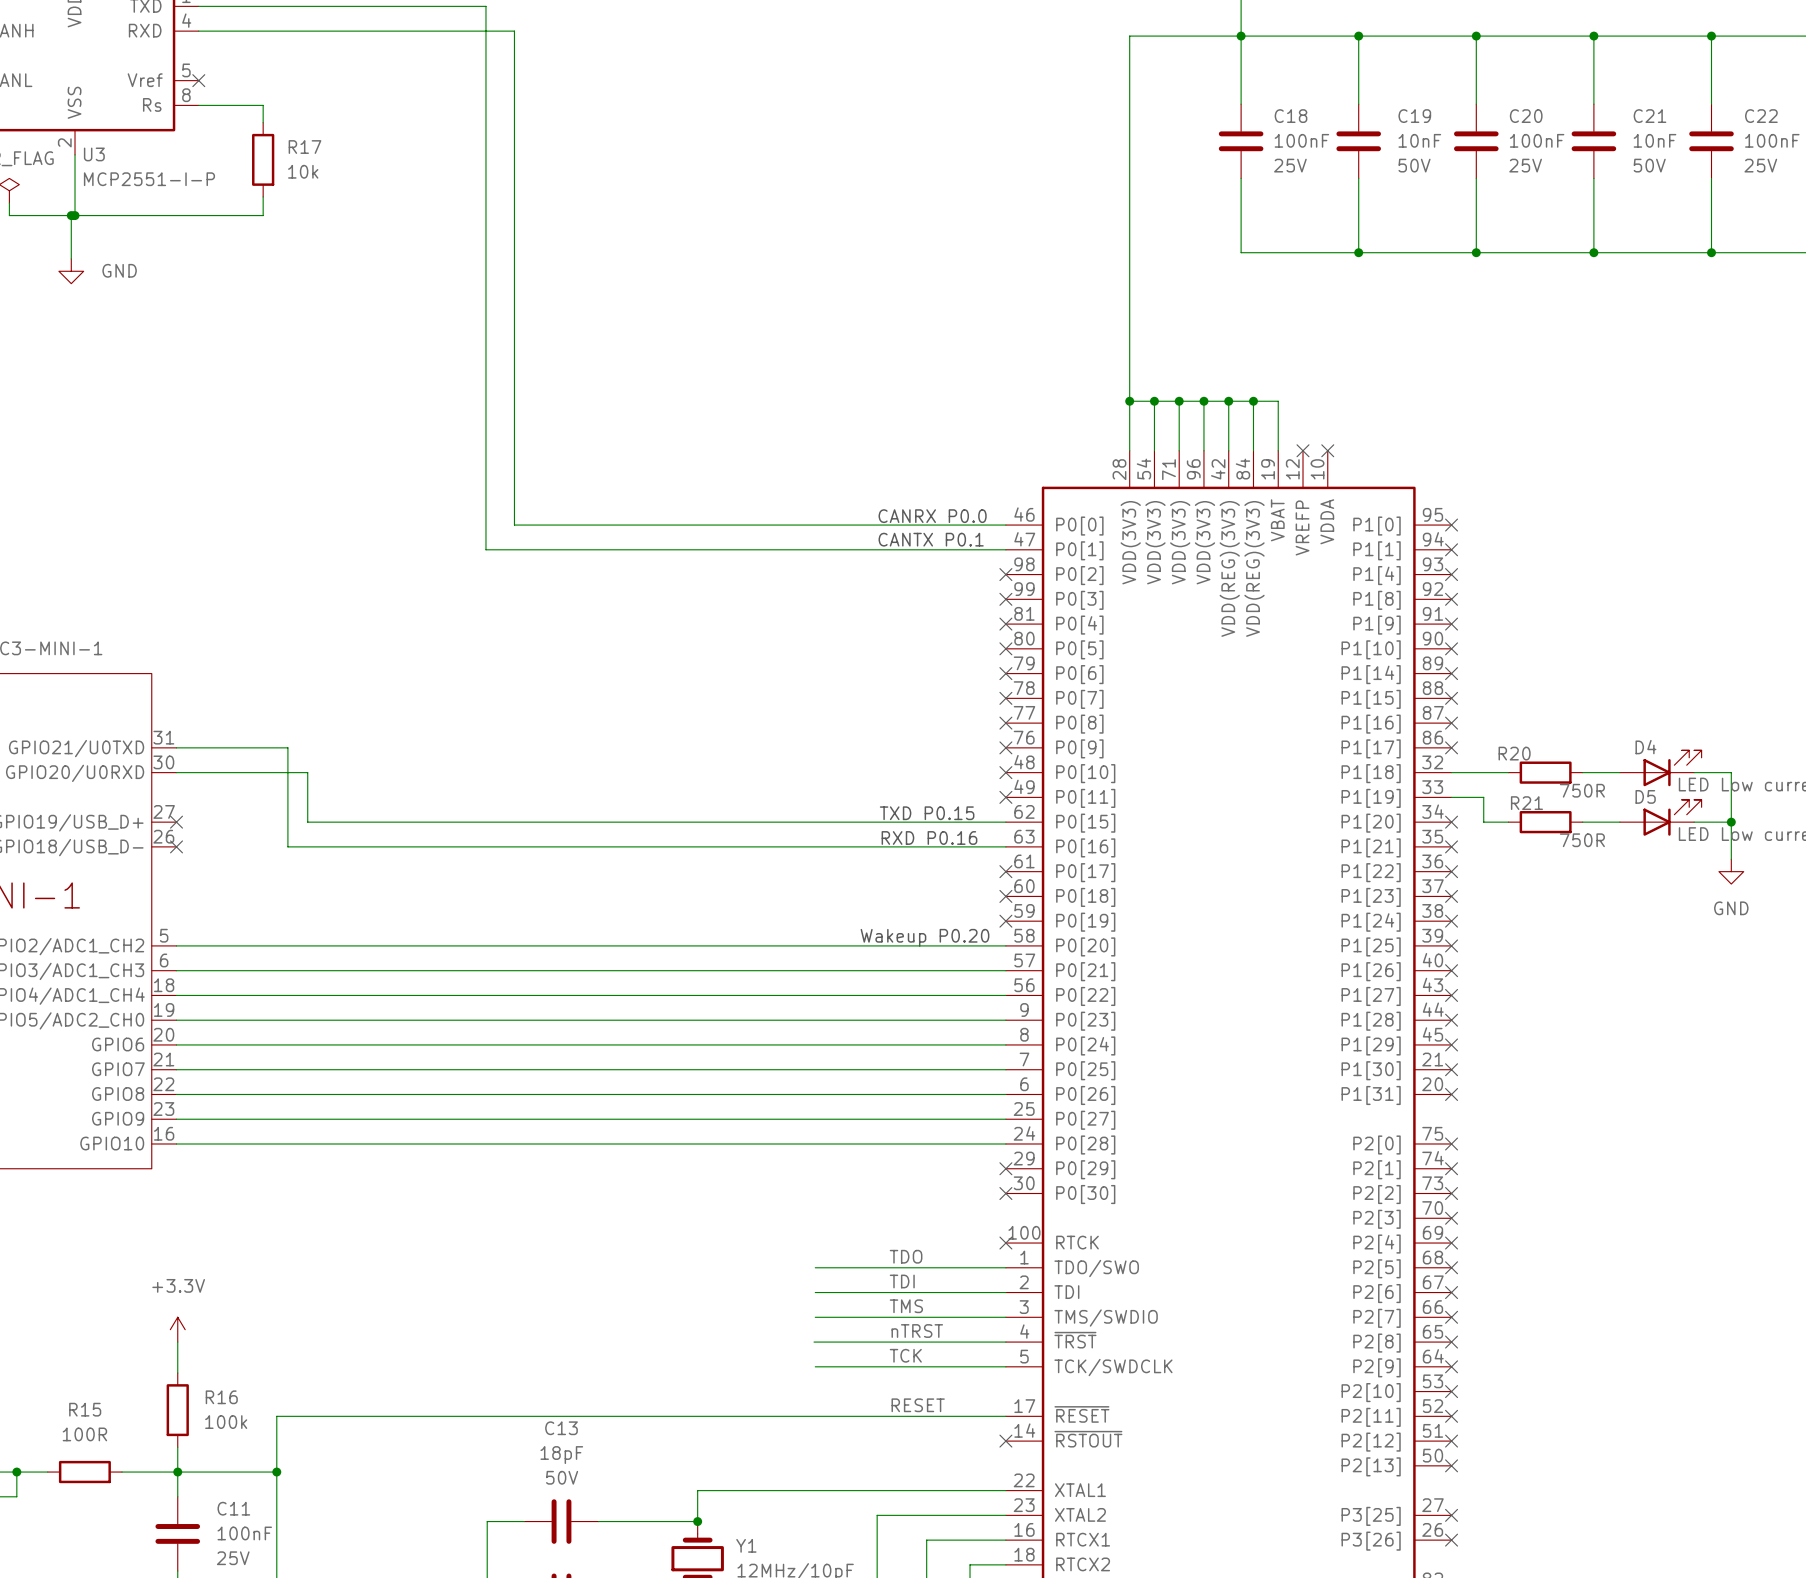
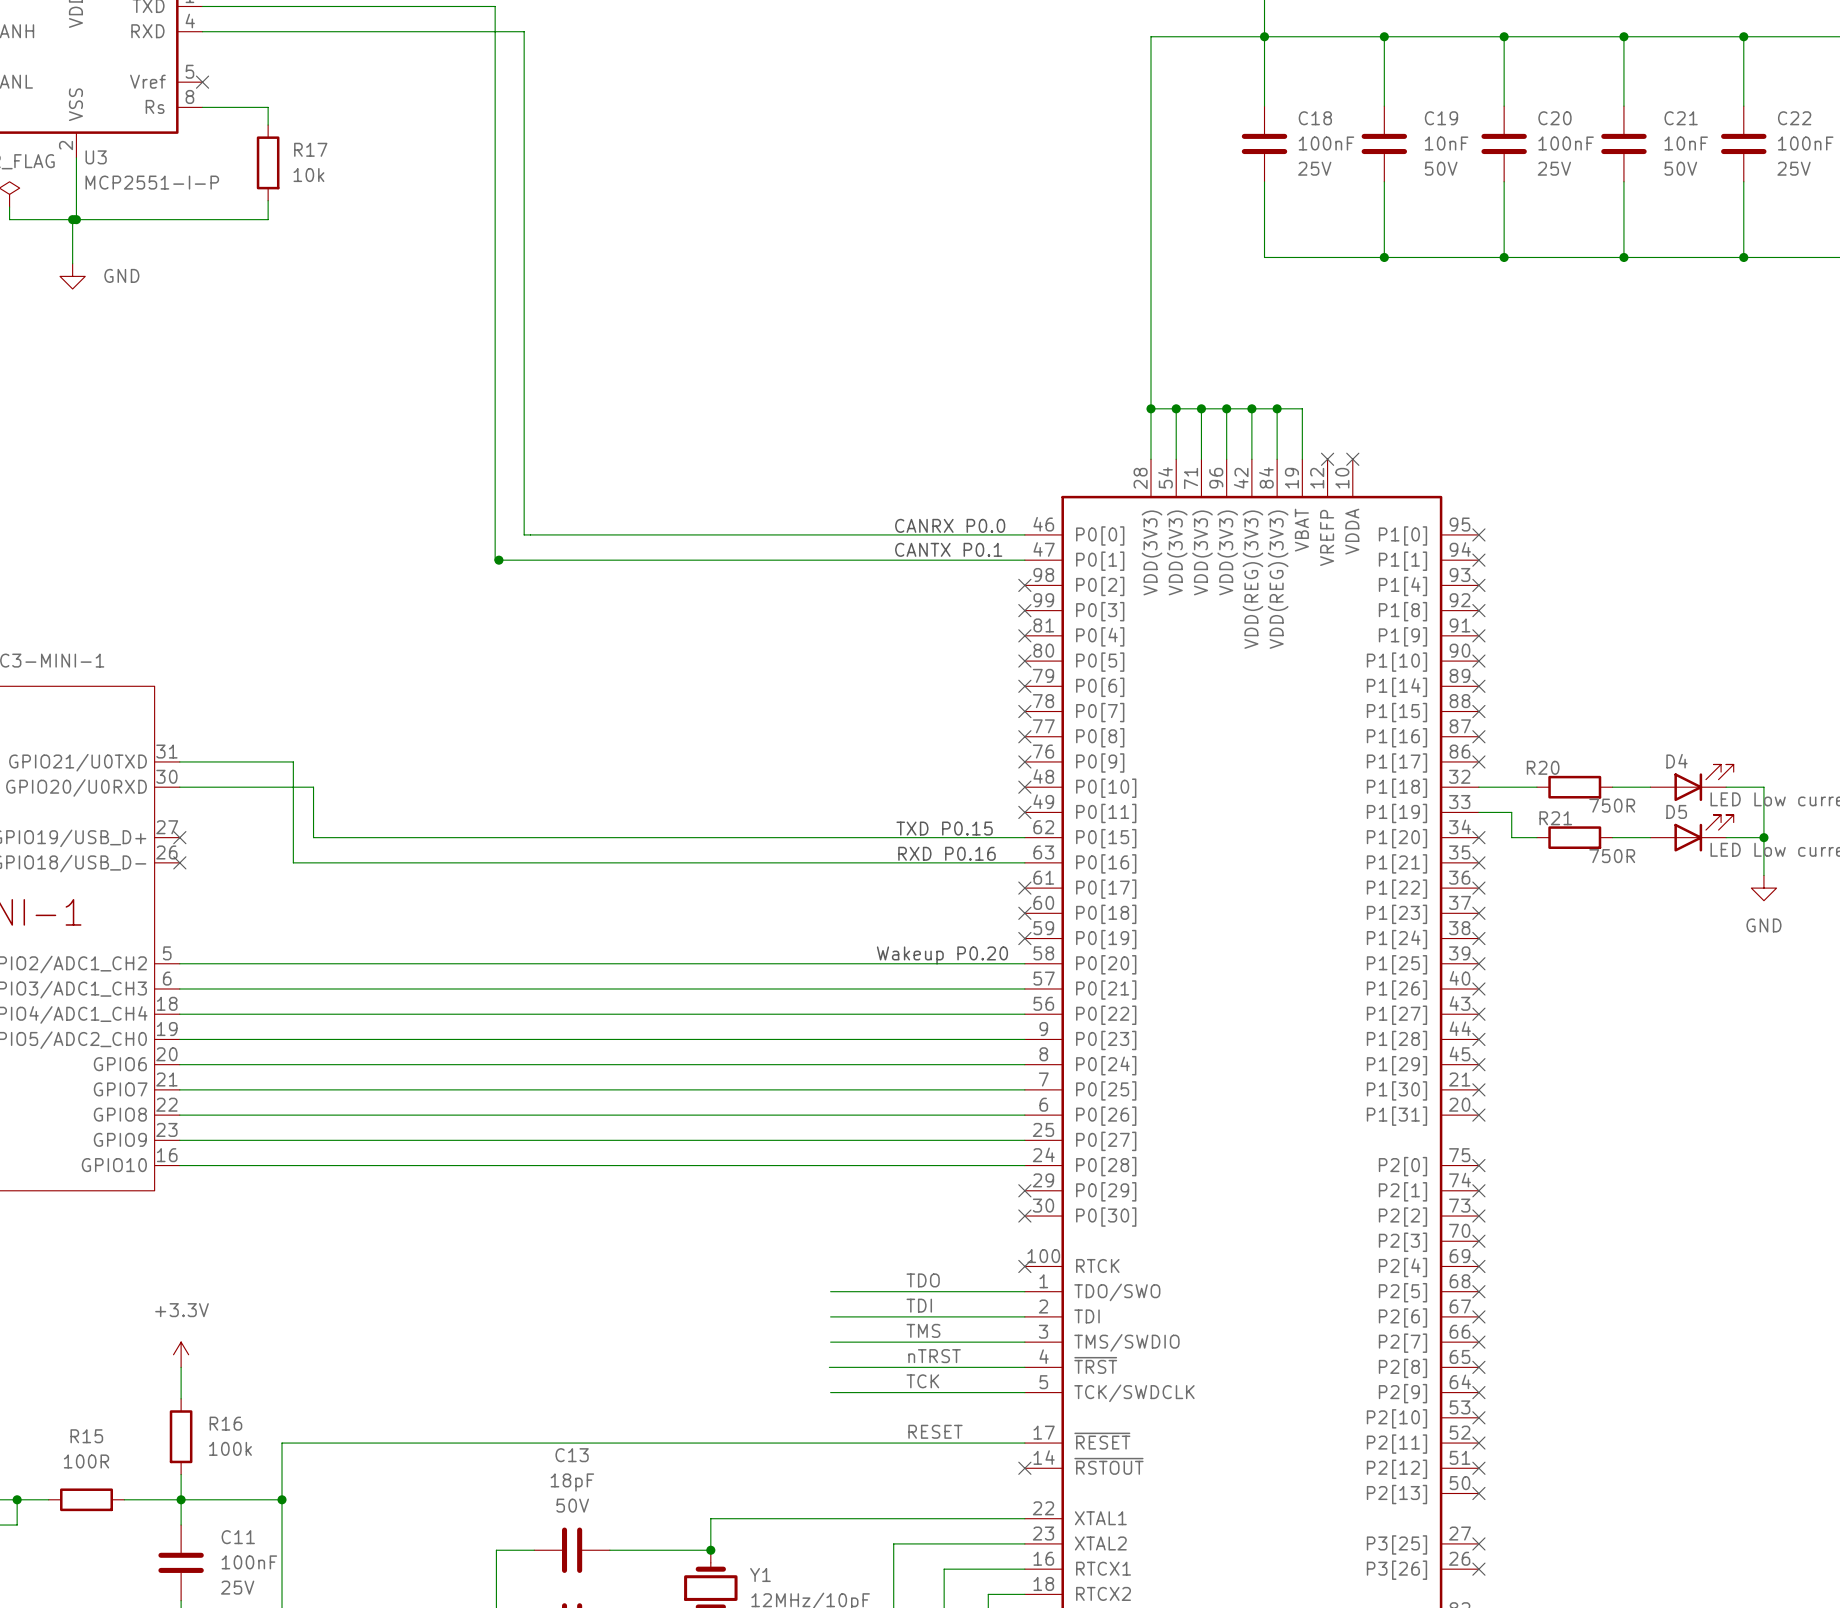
junction: none -> (498, 560)

